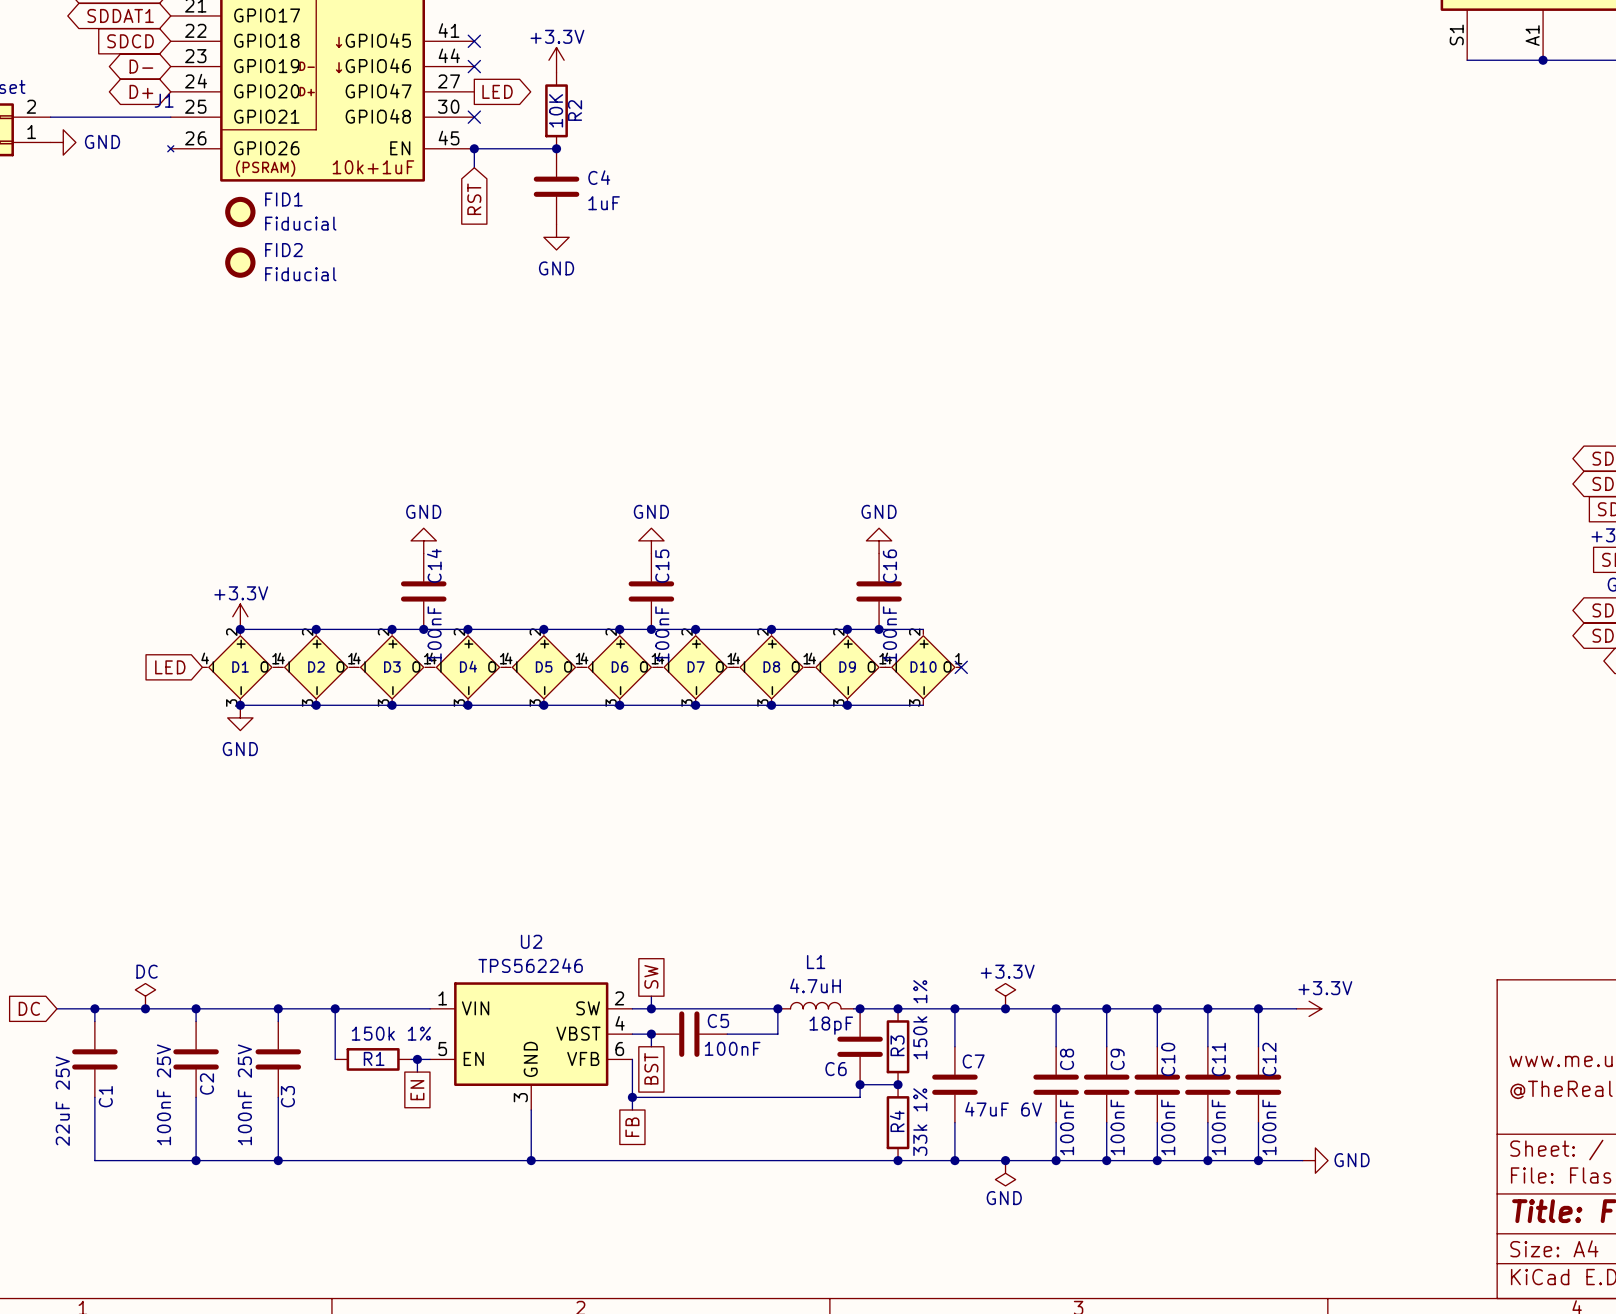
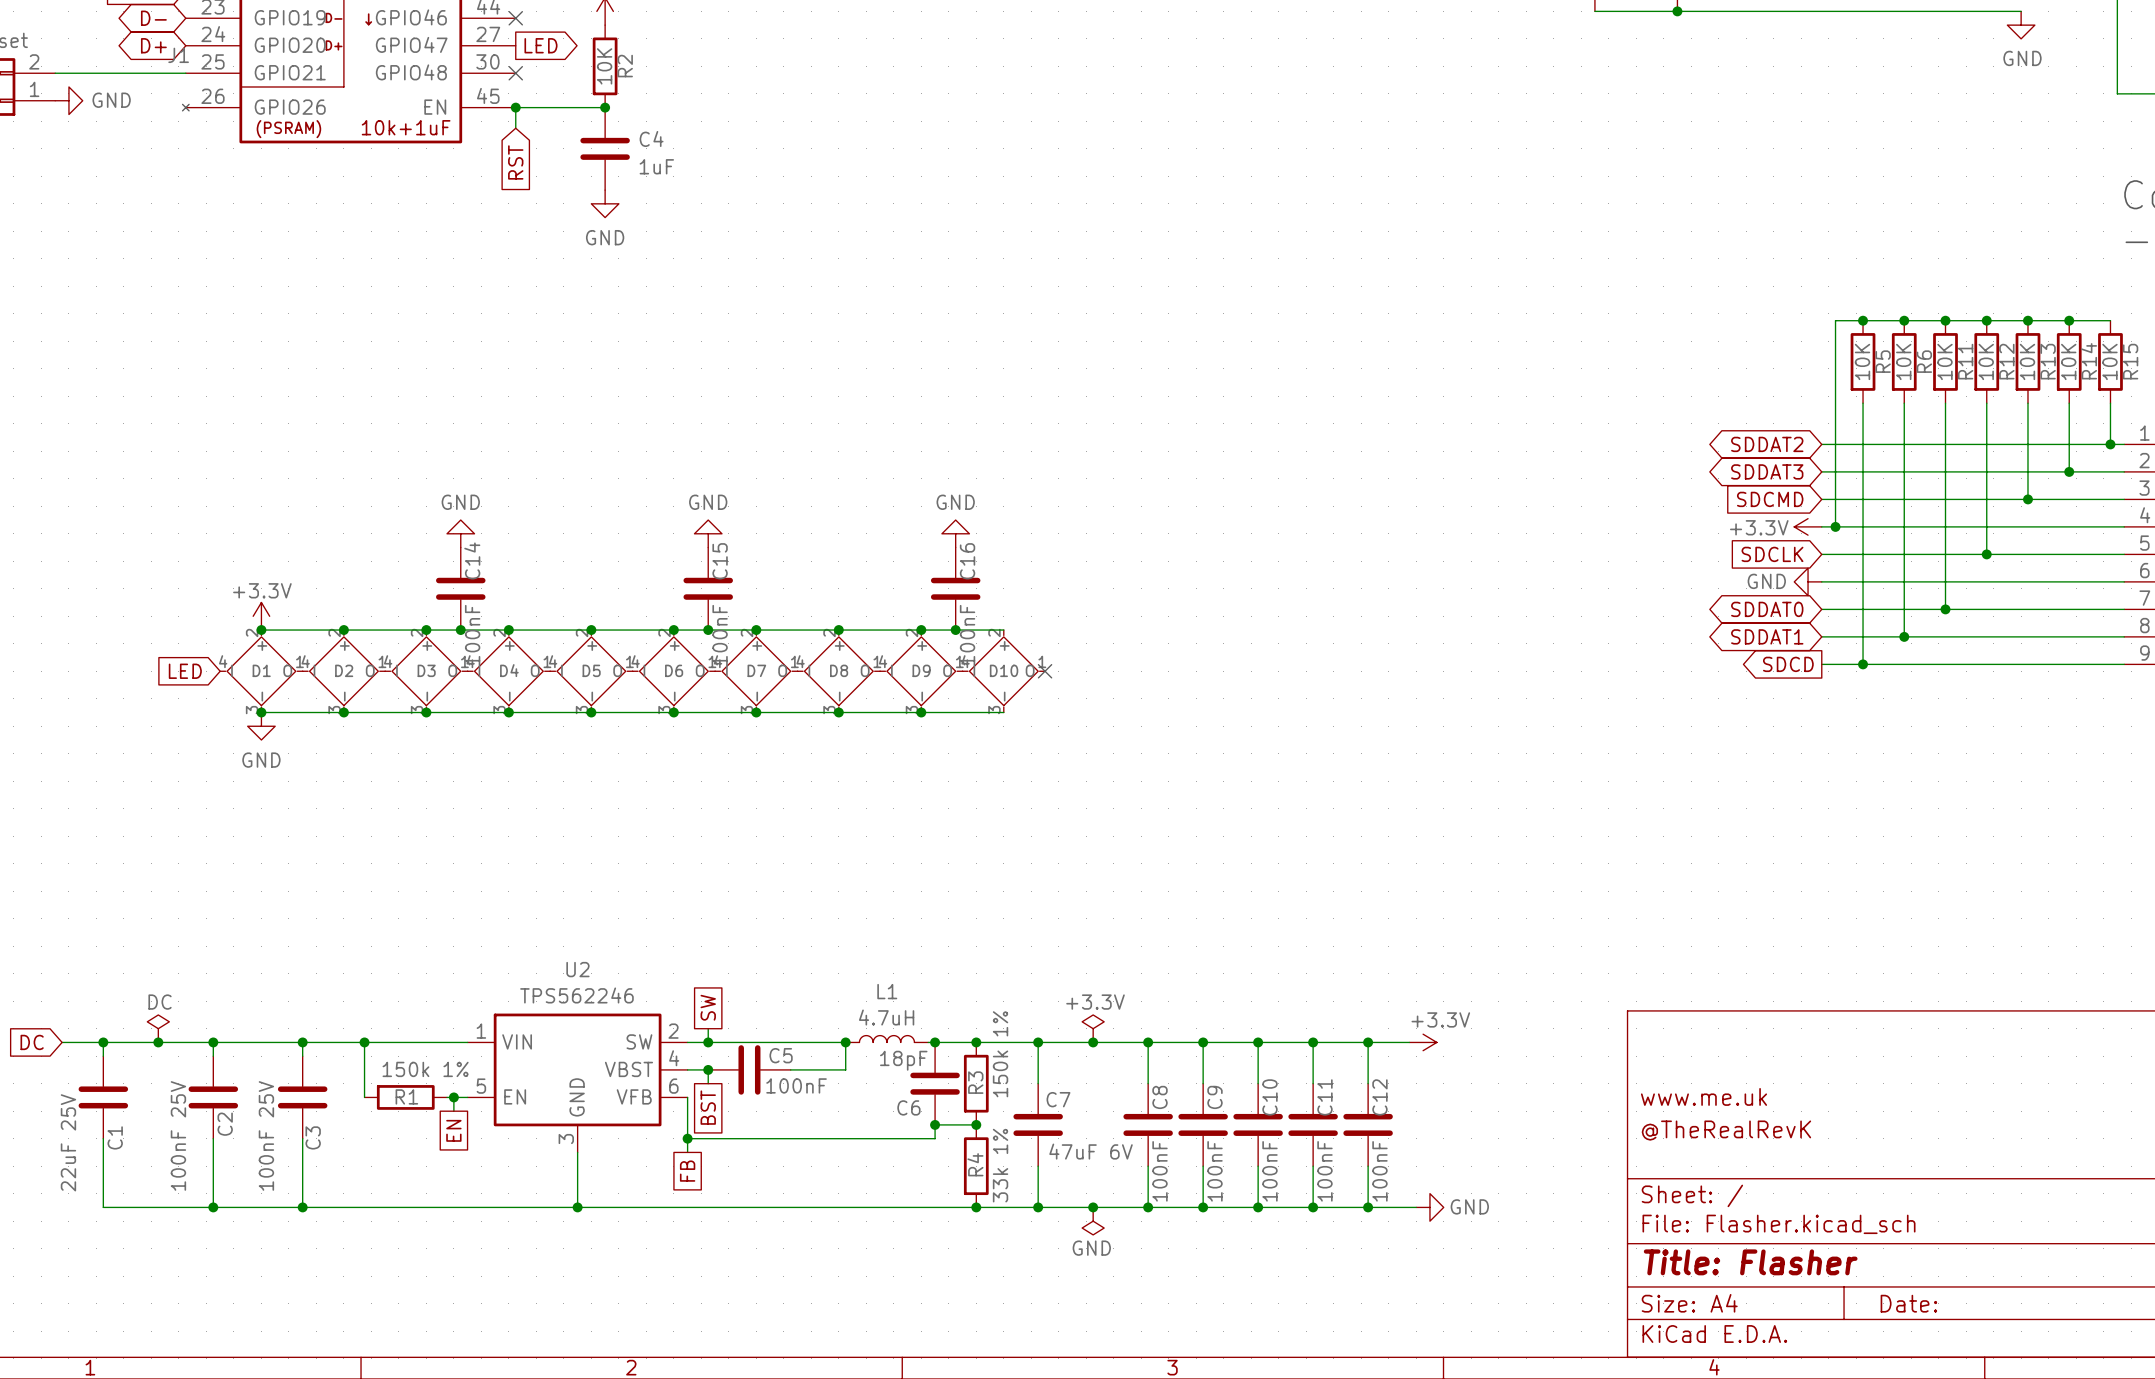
FID1: Fiducial (240, 212) -> none
FID2: Fiducial (240, 262) -> none

